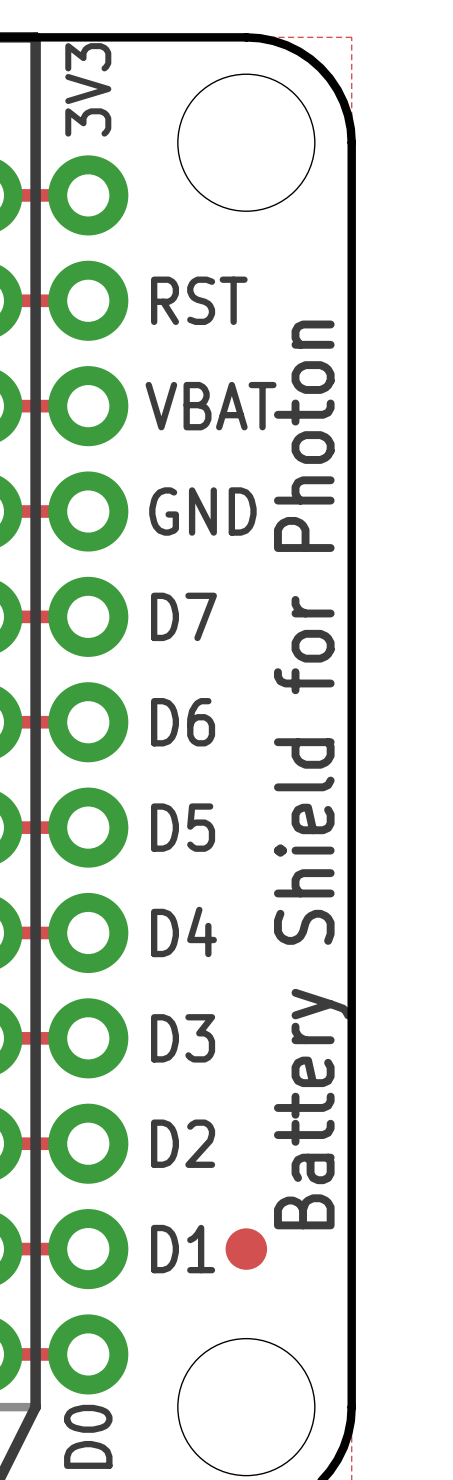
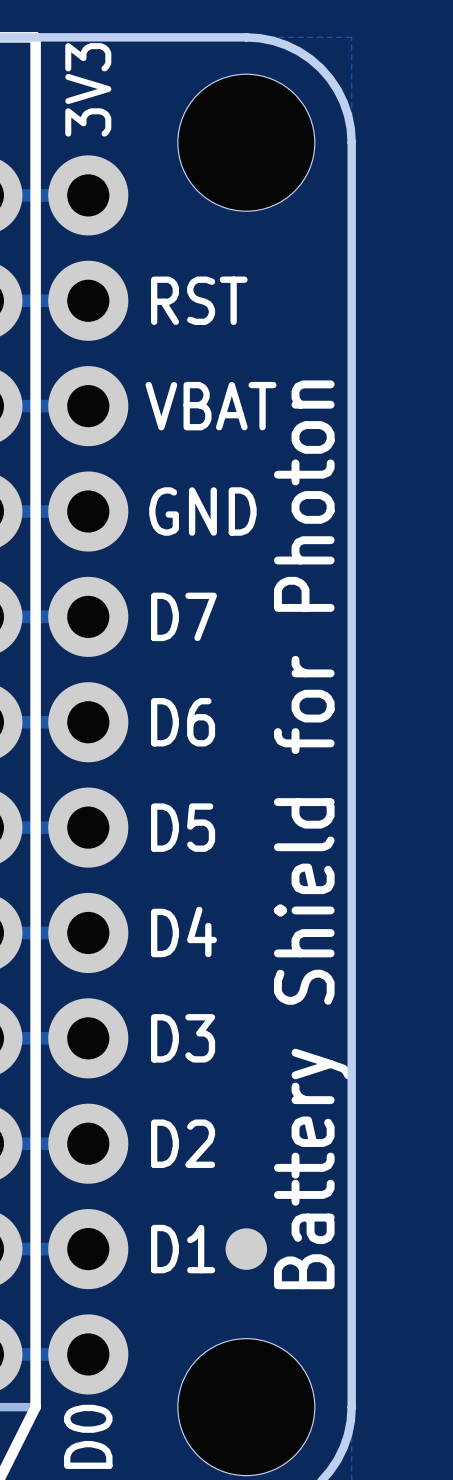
text position: Battery Shield for Photon (313, 774) -> Battery Shield for Photon (313, 834)

